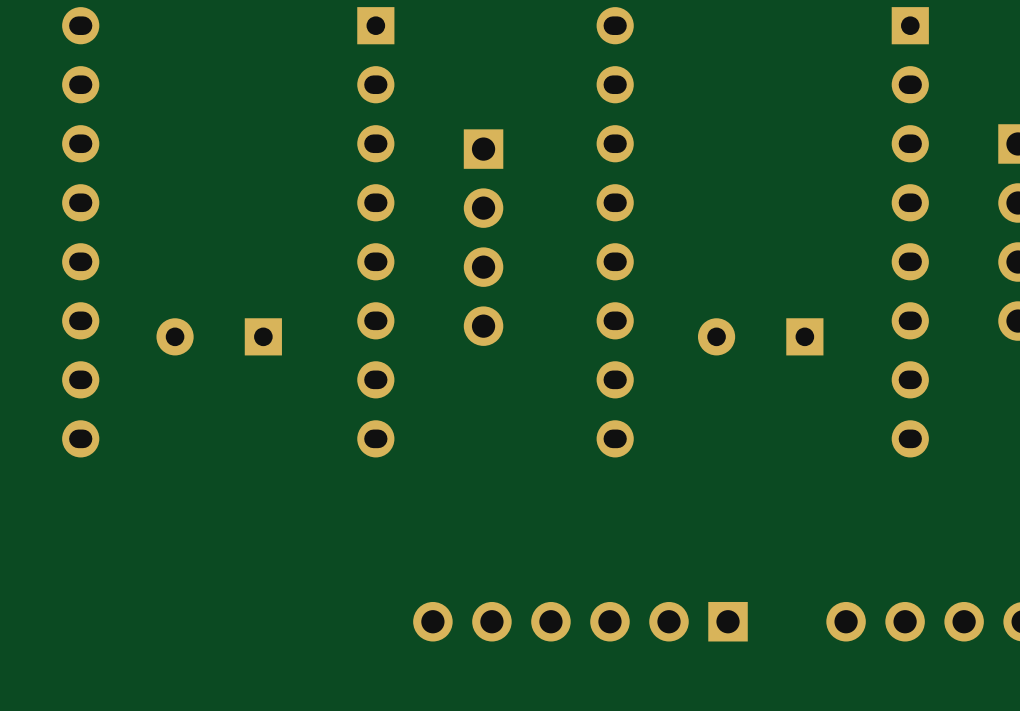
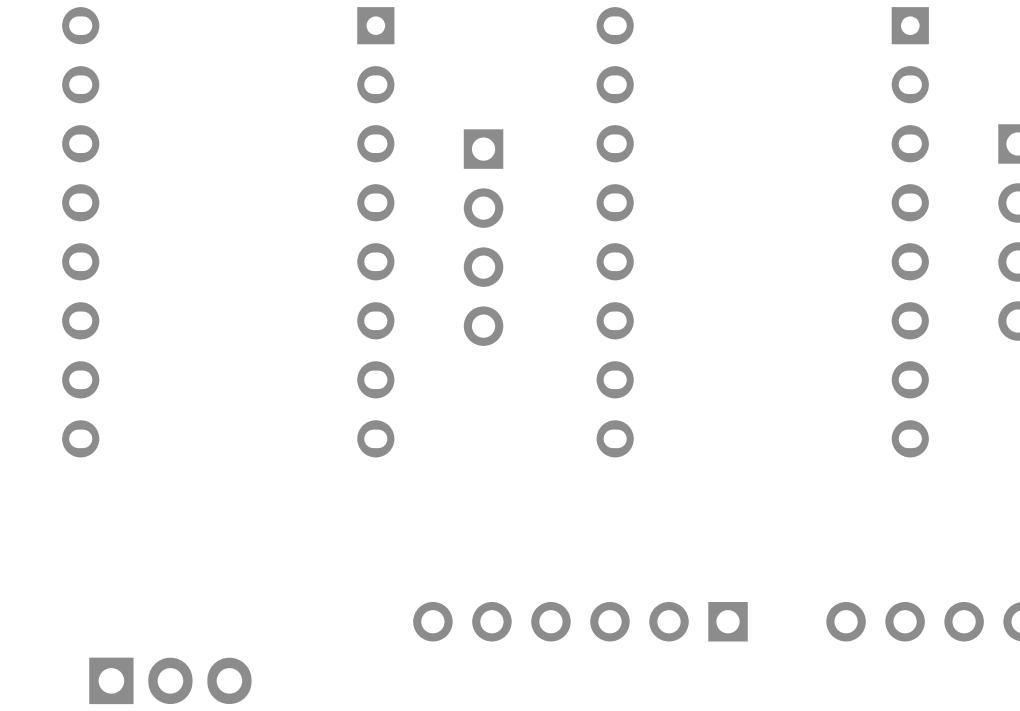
part: (219, 336) -> none
part: (760, 336) -> none
part: none -> (170, 680)

